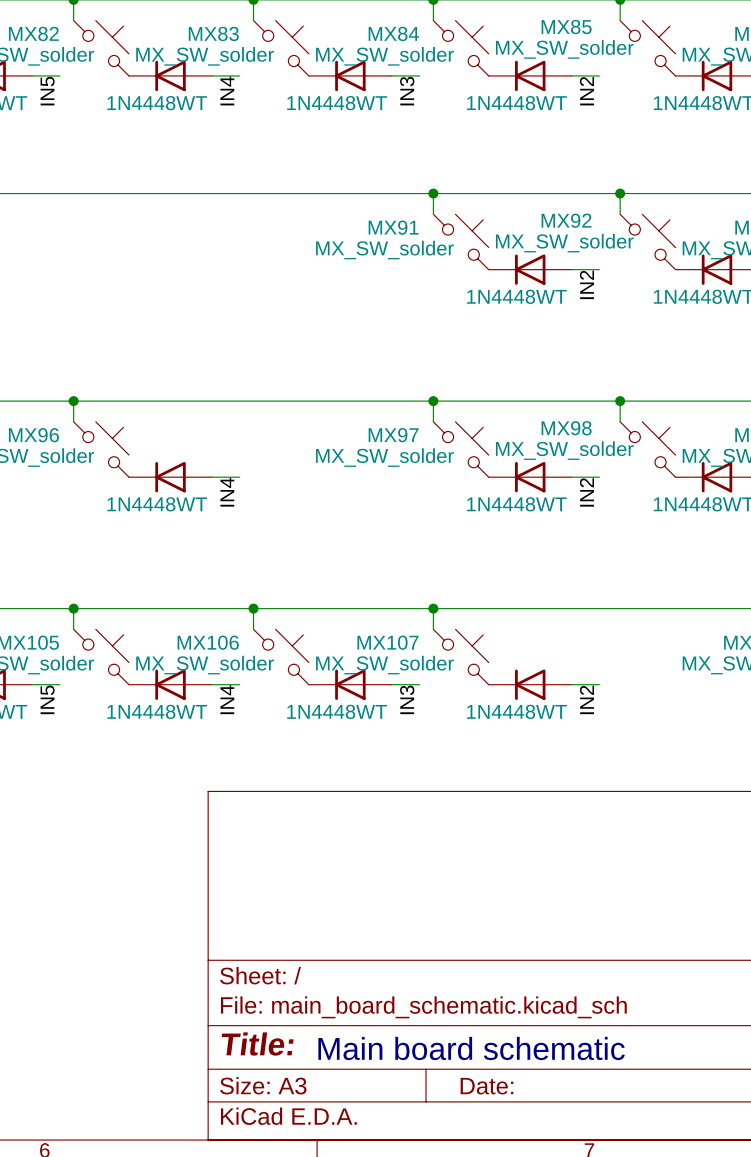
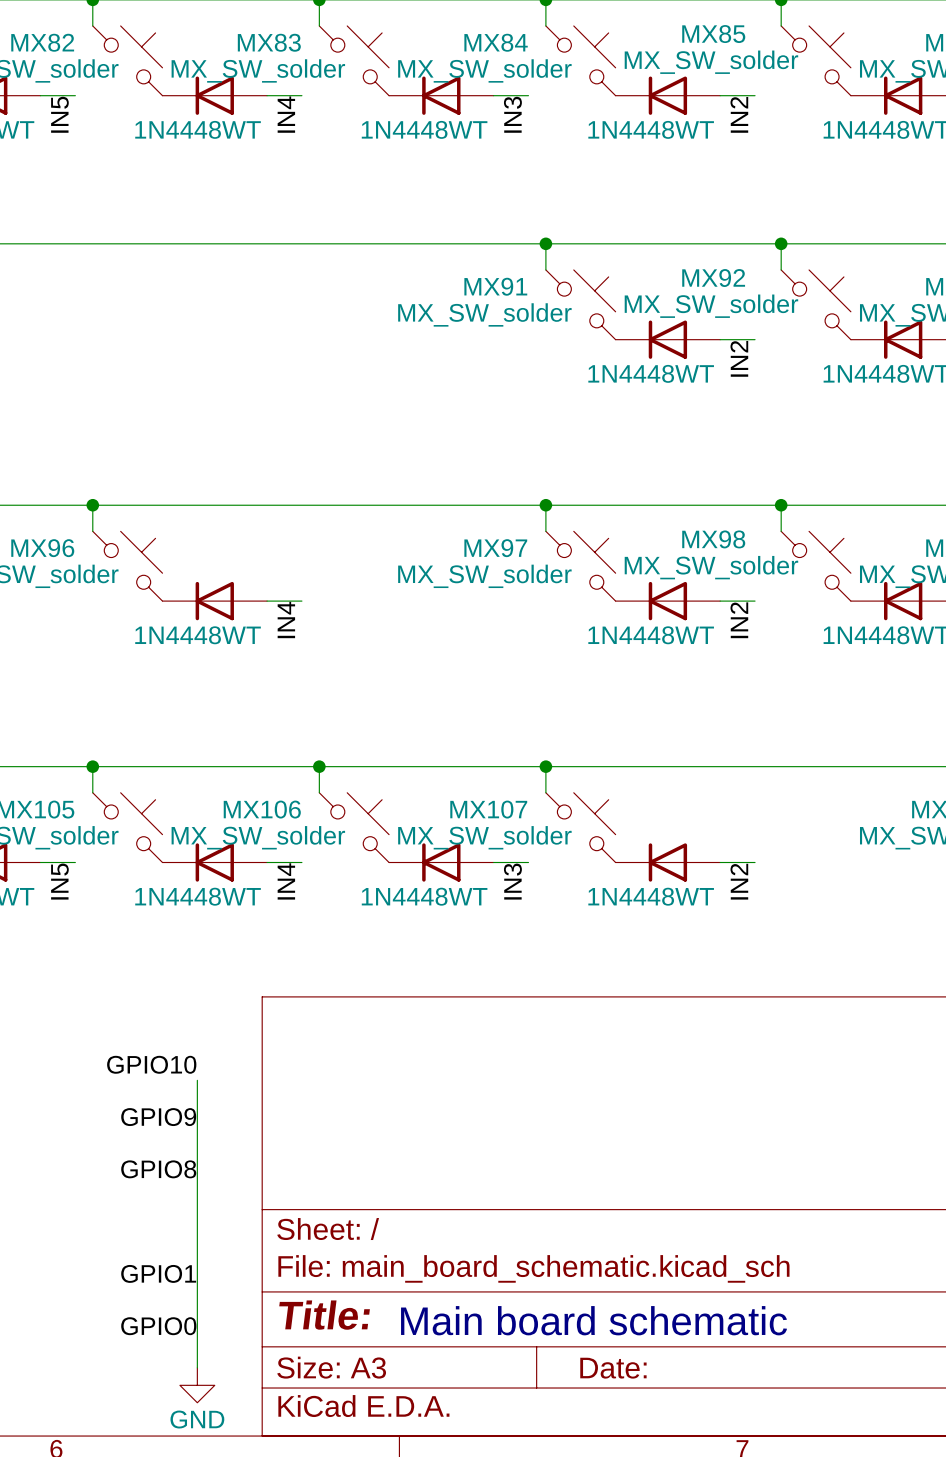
label: none -> GPIO10 (151, 1064)
wire: none -> (197, 1080) (197, 1367)
label: none -> GPIO9 (158, 1117)
label: none -> GPIO8 (158, 1169)
label: none -> GPIO1 (158, 1273)
label: none -> GPIO0 (158, 1326)
power symbol: none -> GND (197, 1385)

